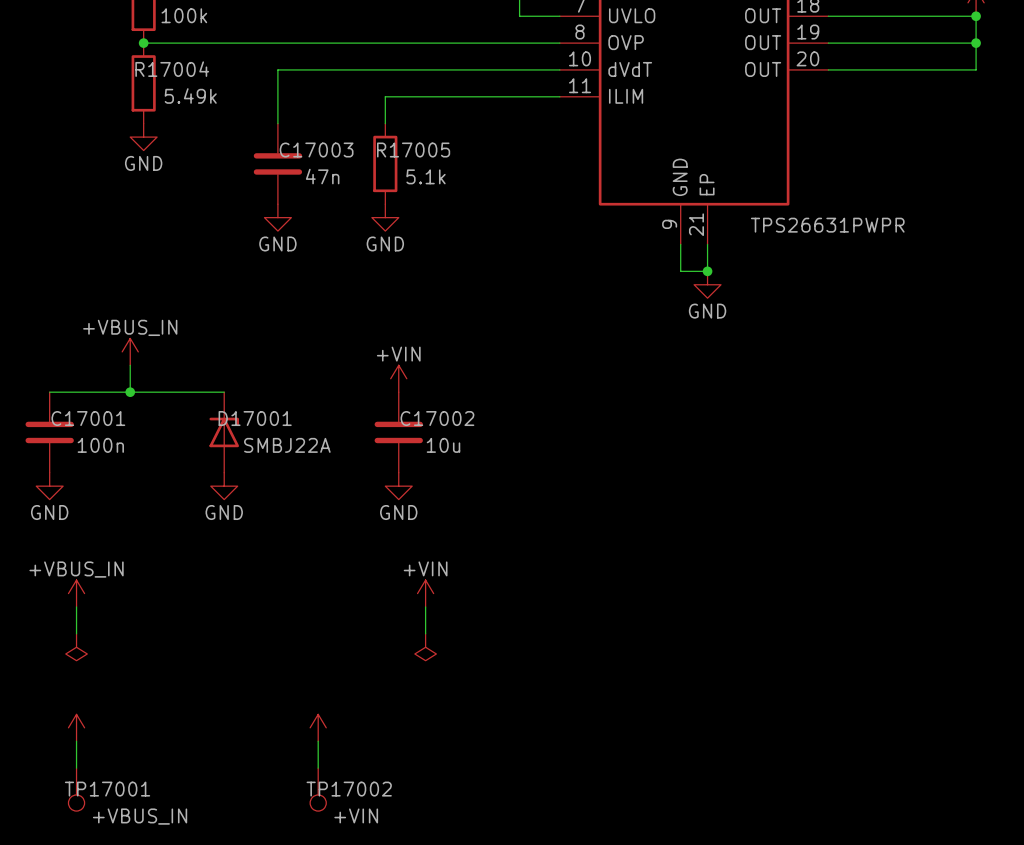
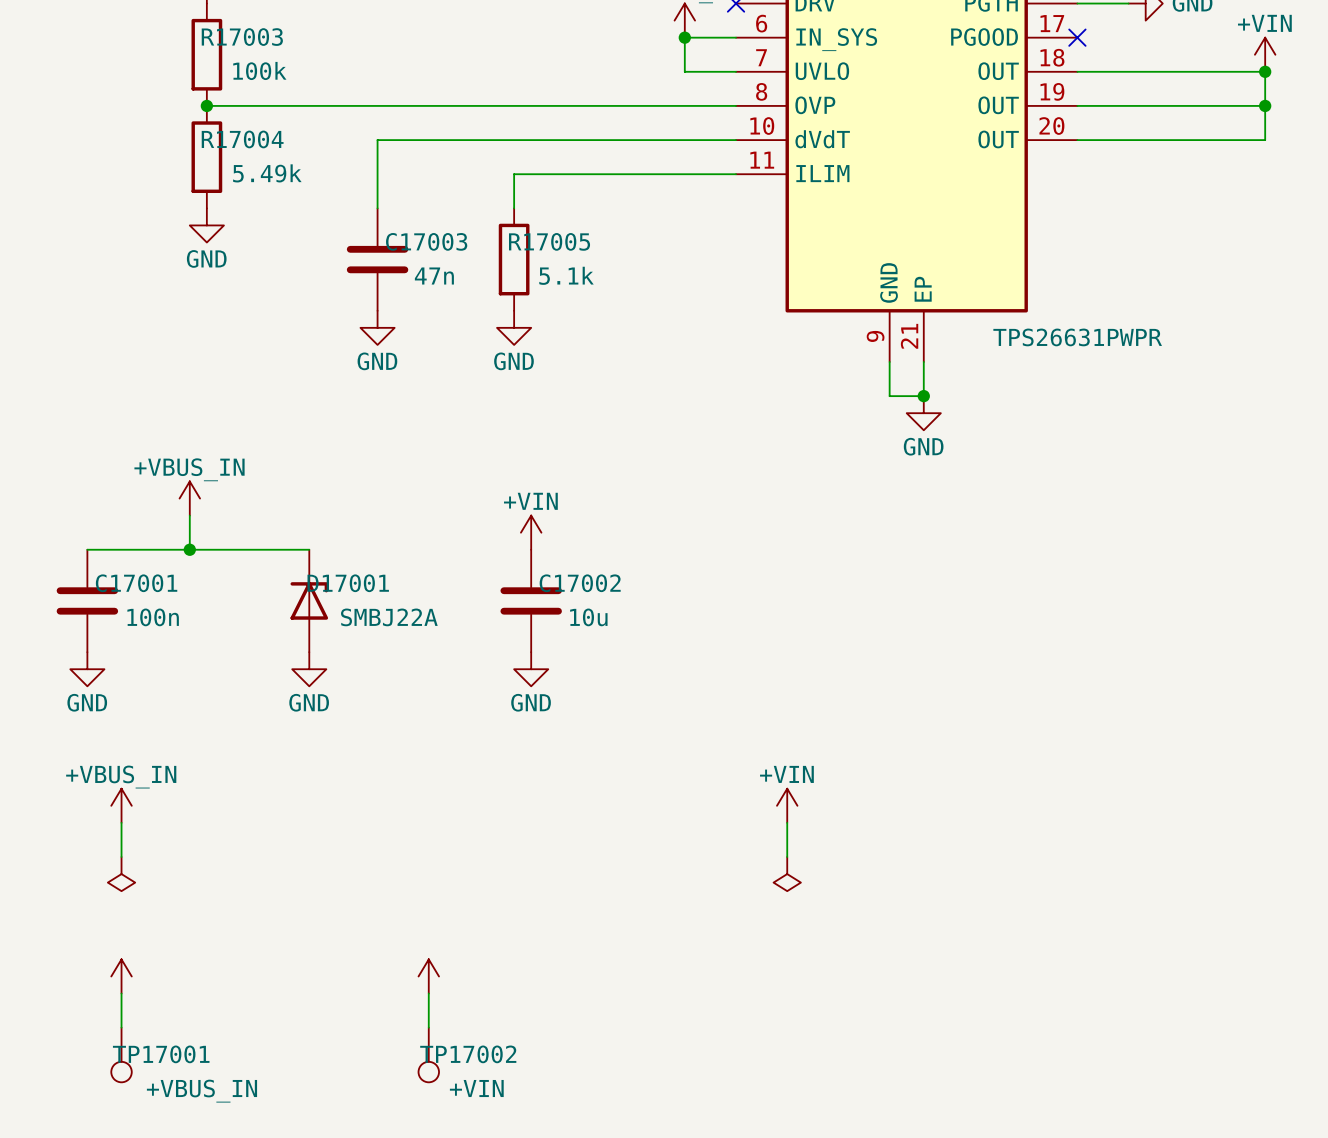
power symbol position: +VIN (425, 593) -> +VIN (787, 805)
wire: (425, 606) (425, 633) -> (787, 822) (787, 857)
power symbol position: (425, 647) -> (787, 874)

